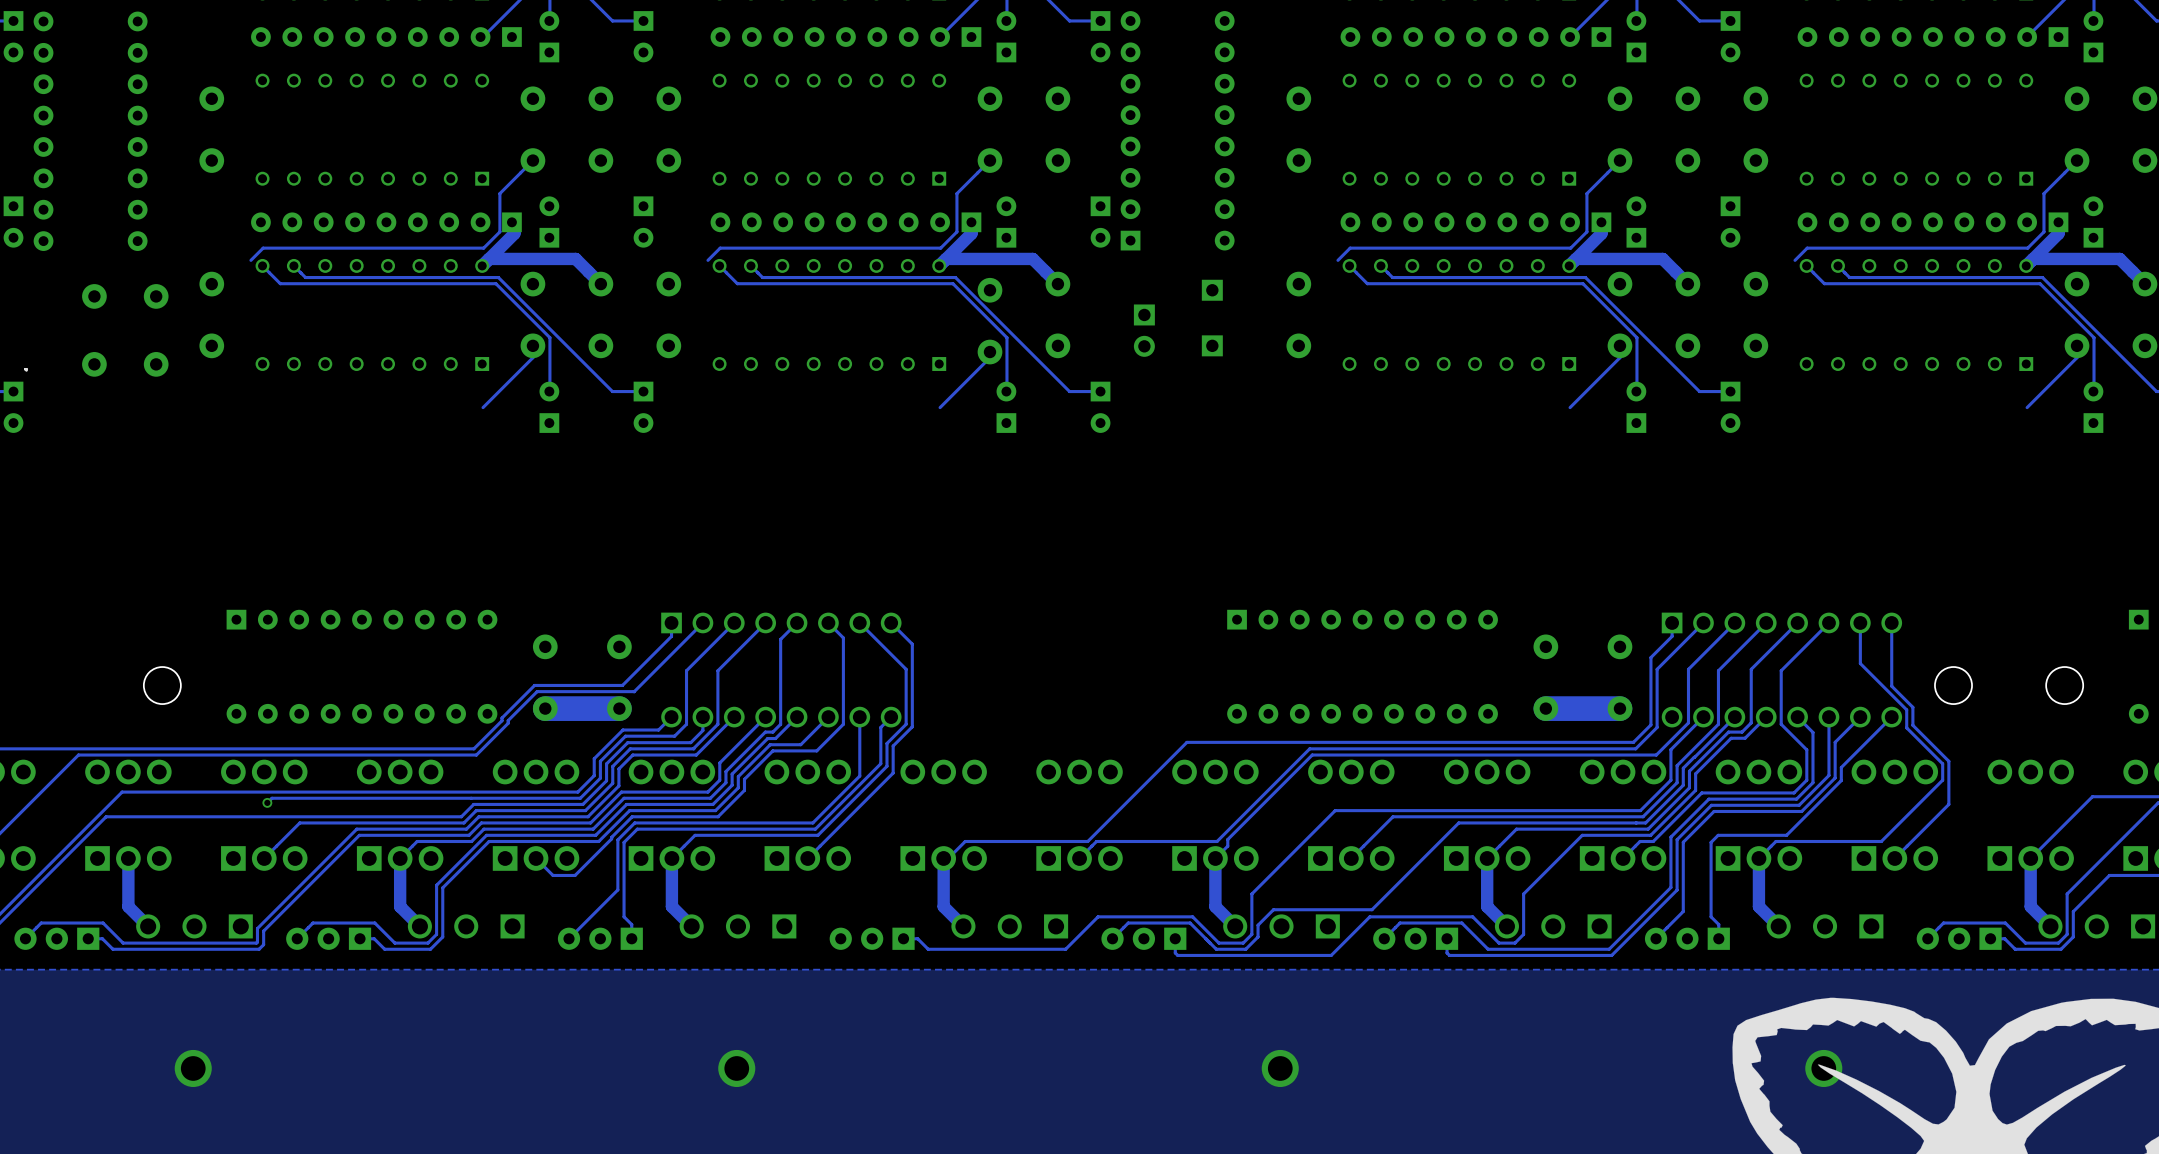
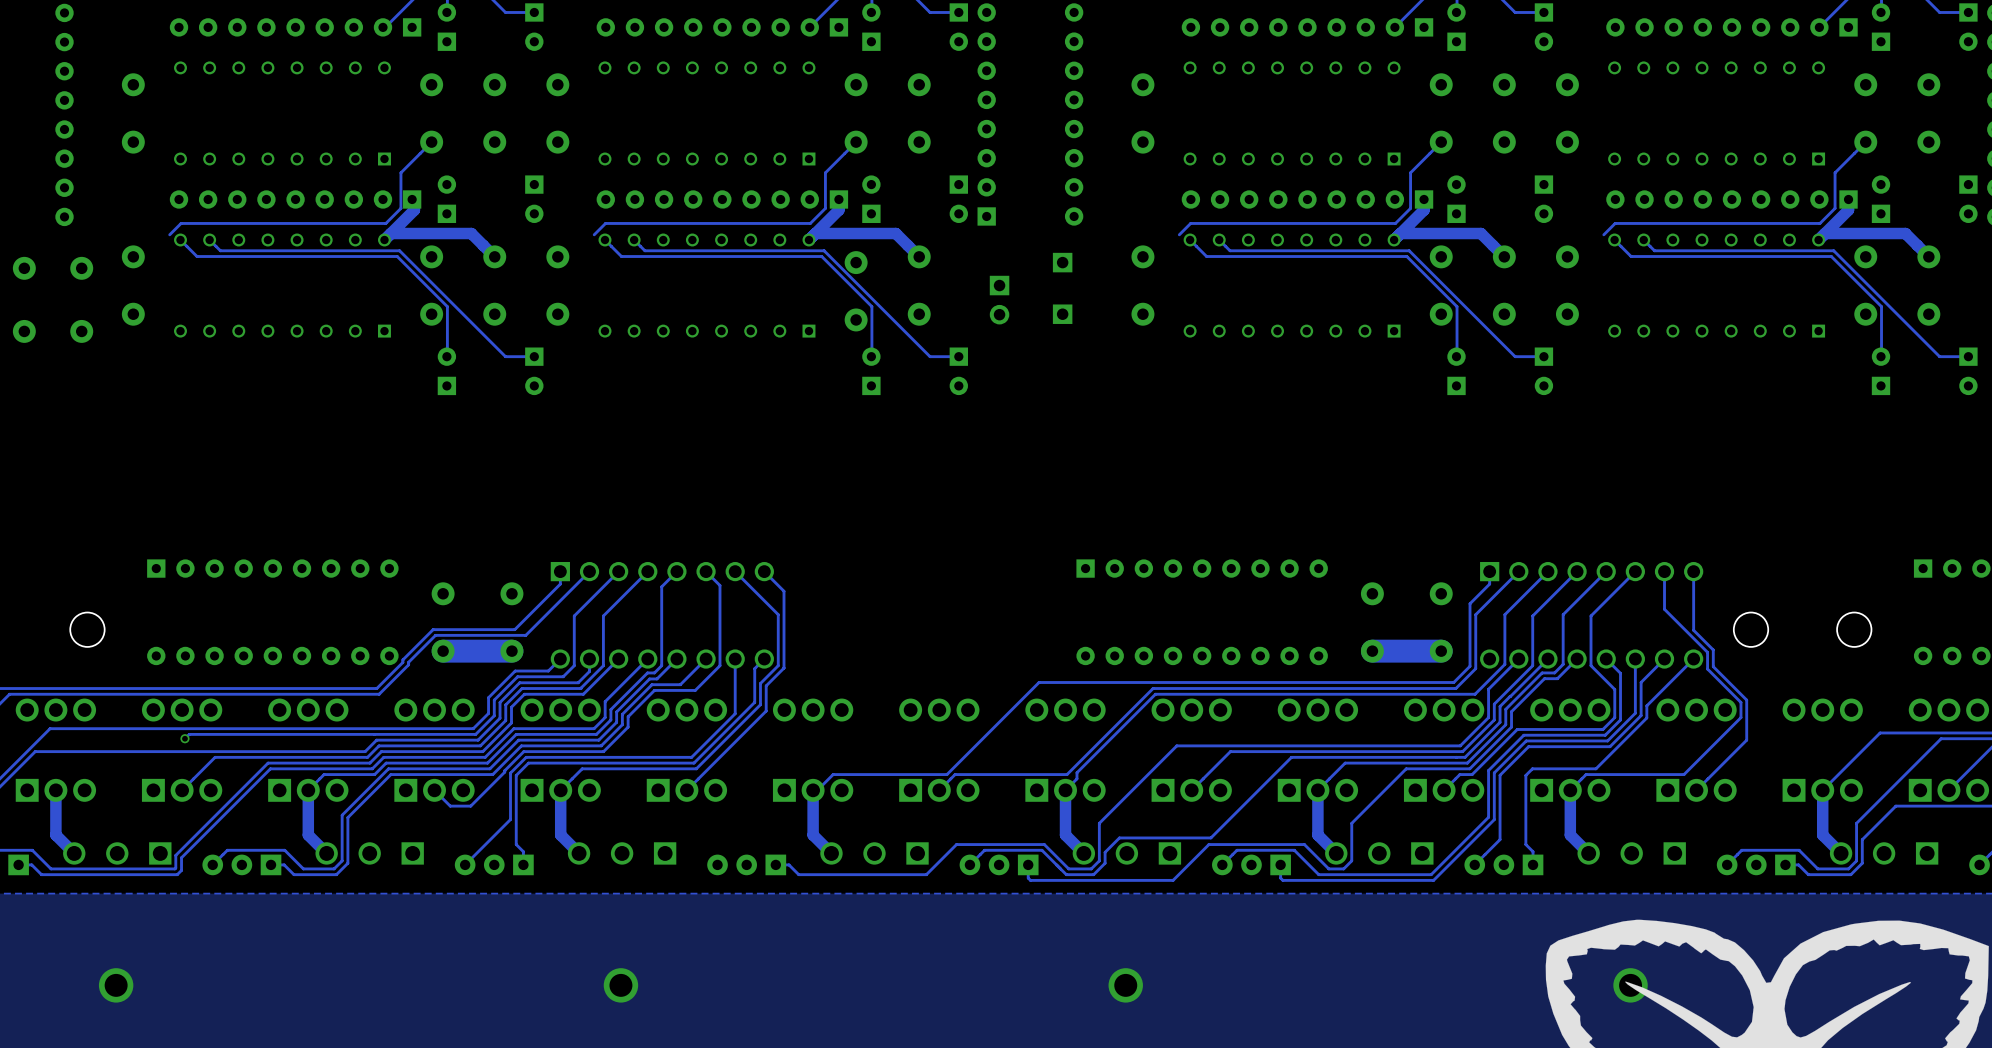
track: (532, 345) (532, 357) (483, 407) -> none
track: (1619, 345) (1619, 357) (1570, 407) -> none
track: (2077, 345) (2077, 357) (2027, 407) -> none
track: (989, 357) (940, 407) -> none

